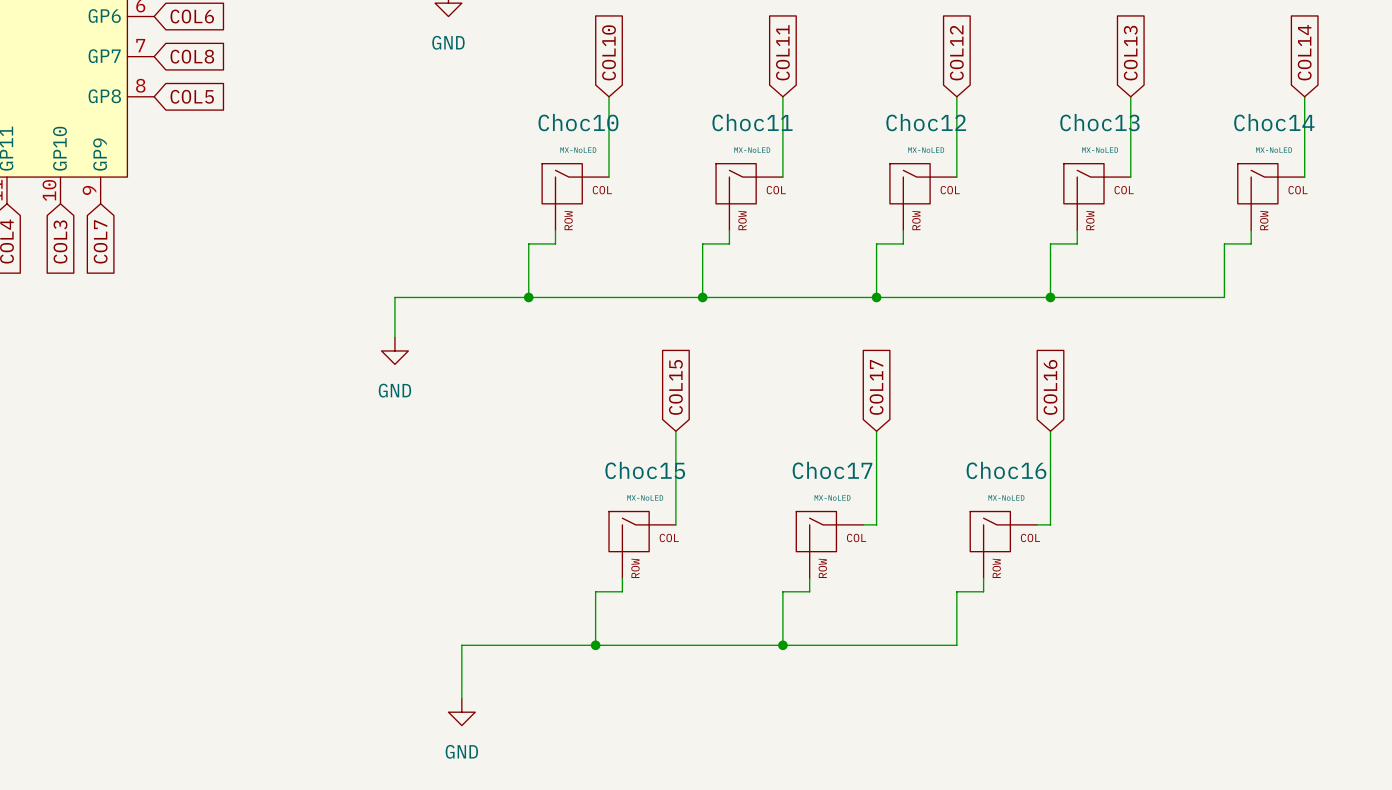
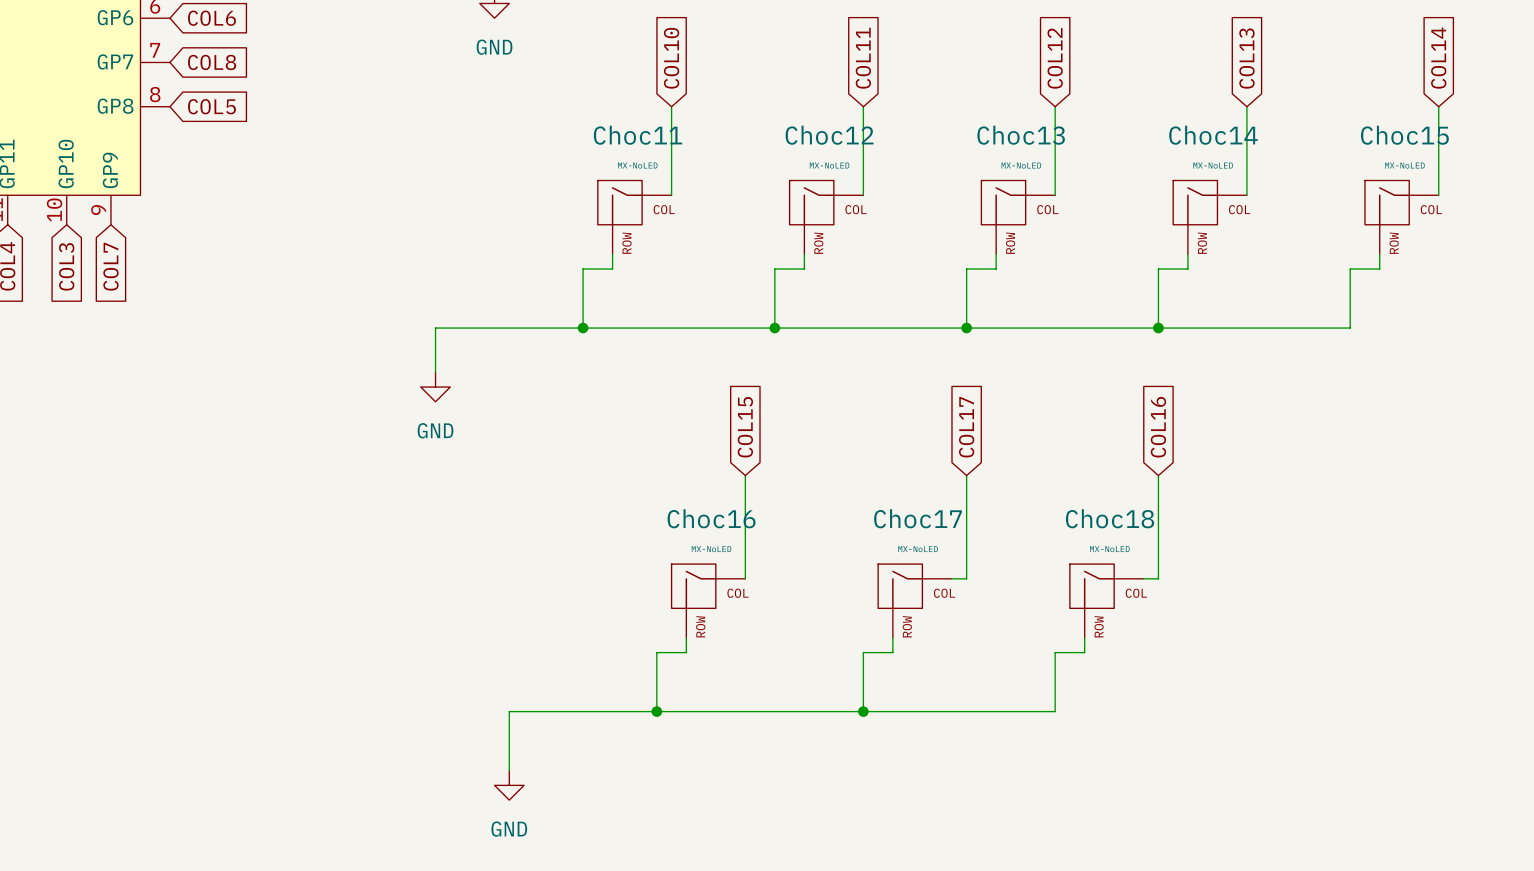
Choc10 name: Choc10 (578, 122) -> Choc11 (638, 135)
Choc11 name: Choc11 (752, 122) -> Choc12 (829, 135)
Choc12 name: Choc12 (926, 122) -> Choc13 (1021, 135)
Choc13 name: Choc13 (1099, 122) -> Choc14 (1213, 135)
Choc14 name: Choc14 (1274, 122) -> Choc15 (1404, 135)
Choc15 name: Choc15 (645, 470) -> Choc16 (711, 518)
Choc16 name: Choc16 (1006, 470) -> Choc18 (1110, 518)

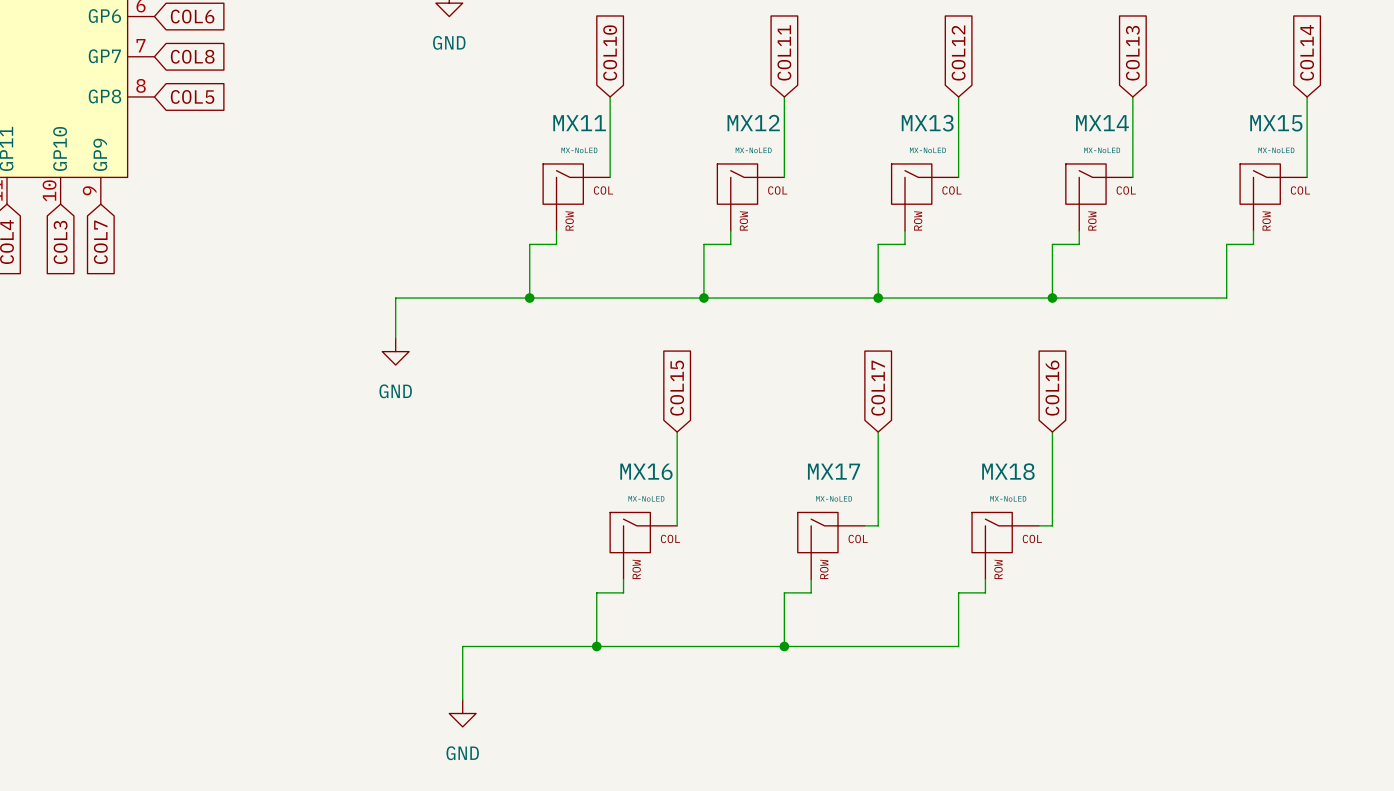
Choc11 name: Choc11 (638, 135) -> MX11 (579, 123)
Choc12 name: Choc12 (829, 135) -> MX12 (753, 123)
Choc13 name: Choc13 (1021, 135) -> MX13 (927, 123)
Choc14 name: Choc14 (1213, 135) -> MX14 (1102, 123)
Choc15 name: Choc15 (1404, 135) -> MX15 (1276, 123)
Choc16 name: Choc16 (711, 518) -> MX16 (646, 471)
Choc17 name: Choc17 (918, 518) -> MX17 (834, 471)
Choc18 name: Choc18 (1110, 518) -> MX18 (1008, 471)

